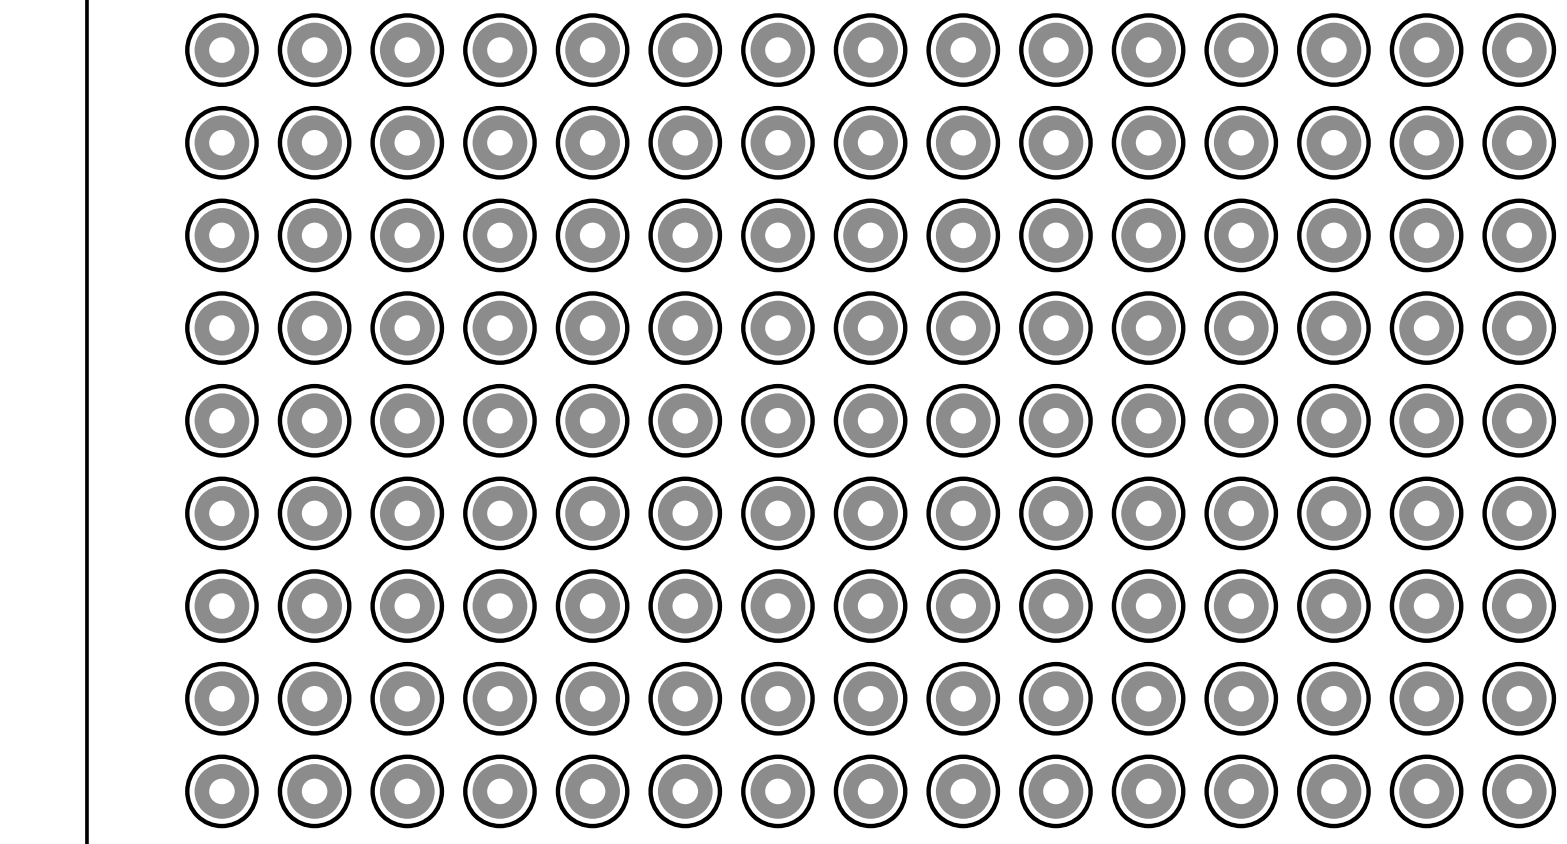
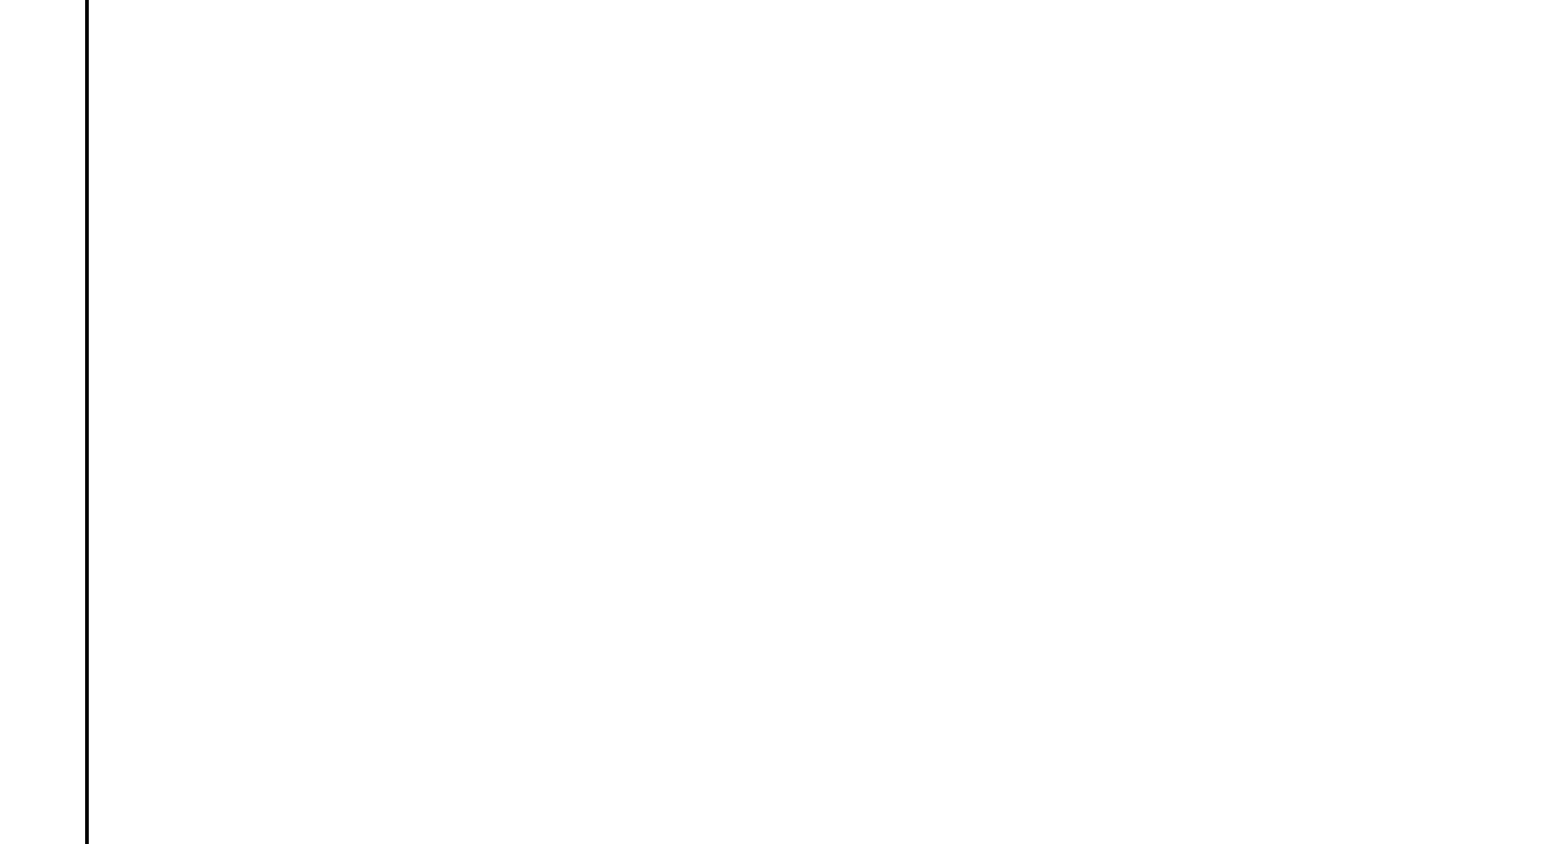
part: (221, 50) -> none
part: (314, 50) -> none
part: (407, 50) -> none
part: (499, 50) -> none
part: (592, 50) -> none
part: (685, 50) -> none
part: (777, 50) -> none
part: (870, 50) -> none
part: (963, 50) -> none
part: (1055, 50) -> none
part: (1148, 50) -> none
part: (1241, 50) -> none
part: (1333, 50) -> none
part: (1426, 50) -> none
part: (1519, 50) -> none
part: (221, 142) -> none
part: (314, 142) -> none
part: (407, 142) -> none
part: (499, 142) -> none
part: (592, 142) -> none
part: (685, 142) -> none
part: (777, 142) -> none
part: (870, 142) -> none
part: (963, 142) -> none
part: (1055, 142) -> none
part: (1148, 142) -> none
part: (1241, 142) -> none
part: (1333, 142) -> none
part: (1426, 142) -> none
part: (1519, 142) -> none
part: (221, 235) -> none
part: (314, 235) -> none
part: (407, 235) -> none
part: (499, 235) -> none
part: (592, 235) -> none
part: (685, 235) -> none
part: (777, 235) -> none
part: (870, 235) -> none
part: (963, 235) -> none
part: (1055, 235) -> none
part: (1148, 235) -> none
part: (1241, 235) -> none
part: (1333, 235) -> none
part: (1426, 235) -> none
part: (1519, 235) -> none
part: (221, 328) -> none
part: (314, 328) -> none
part: (407, 328) -> none
part: (499, 328) -> none
part: (592, 328) -> none
part: (685, 328) -> none
part: (777, 328) -> none
part: (870, 328) -> none
part: (963, 328) -> none
part: (1055, 328) -> none
part: (1148, 328) -> none
part: (1241, 328) -> none
part: (1333, 328) -> none
part: (1426, 328) -> none
part: (1519, 328) -> none
part: (221, 420) -> none
part: (314, 420) -> none
part: (407, 420) -> none
part: (499, 420) -> none
part: (592, 420) -> none
part: (685, 420) -> none
part: (777, 420) -> none
part: (870, 420) -> none
part: (963, 420) -> none
part: (1055, 420) -> none
part: (1148, 420) -> none
part: (1241, 420) -> none
part: (1333, 420) -> none
part: (1426, 420) -> none
part: (1519, 420) -> none
part: (221, 513) -> none
part: (314, 513) -> none
part: (407, 513) -> none
part: (499, 513) -> none
part: (592, 513) -> none
part: (685, 513) -> none
part: (777, 513) -> none
part: (870, 513) -> none
part: (963, 513) -> none
part: (1055, 513) -> none
part: (1148, 513) -> none
part: (1241, 513) -> none
part: (1333, 513) -> none
part: (1426, 513) -> none
part: (1519, 513) -> none
part: (221, 606) -> none
part: (314, 606) -> none
part: (407, 606) -> none
part: (499, 606) -> none
part: (592, 606) -> none
part: (685, 606) -> none
part: (777, 606) -> none
part: (870, 606) -> none
part: (963, 606) -> none
part: (1055, 606) -> none
part: (1148, 606) -> none
part: (1241, 606) -> none
part: (1333, 606) -> none
part: (1426, 606) -> none
part: (1519, 606) -> none
part: (221, 698) -> none
part: (314, 698) -> none
part: (407, 698) -> none
part: (499, 698) -> none
part: (592, 698) -> none
part: (685, 698) -> none
part: (777, 698) -> none
part: (870, 698) -> none
part: (963, 698) -> none
part: (1055, 698) -> none
part: (1148, 698) -> none
part: (1241, 698) -> none
part: (1333, 698) -> none
part: (1426, 698) -> none
part: (1519, 698) -> none
part: (221, 791) -> none
part: (314, 791) -> none
part: (407, 791) -> none
part: (499, 791) -> none
part: (592, 791) -> none
part: (685, 791) -> none
part: (777, 791) -> none
part: (870, 791) -> none
part: (963, 791) -> none
part: (1055, 791) -> none
part: (1148, 791) -> none
part: (1241, 791) -> none
part: (1333, 791) -> none
part: (1426, 791) -> none
part: (1519, 791) -> none

